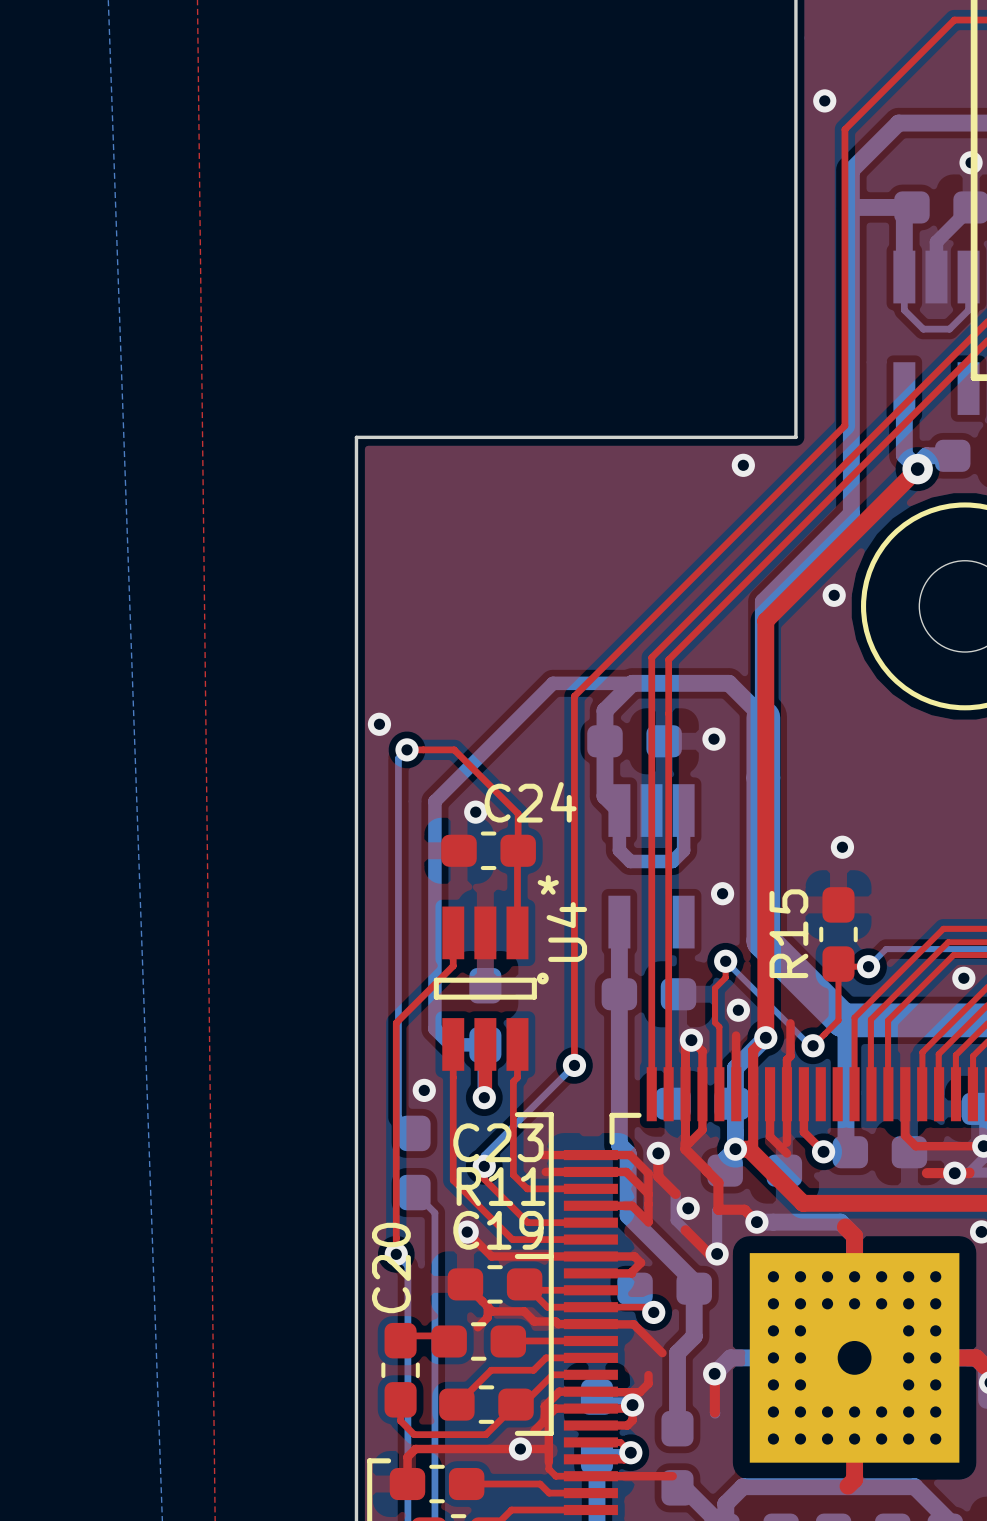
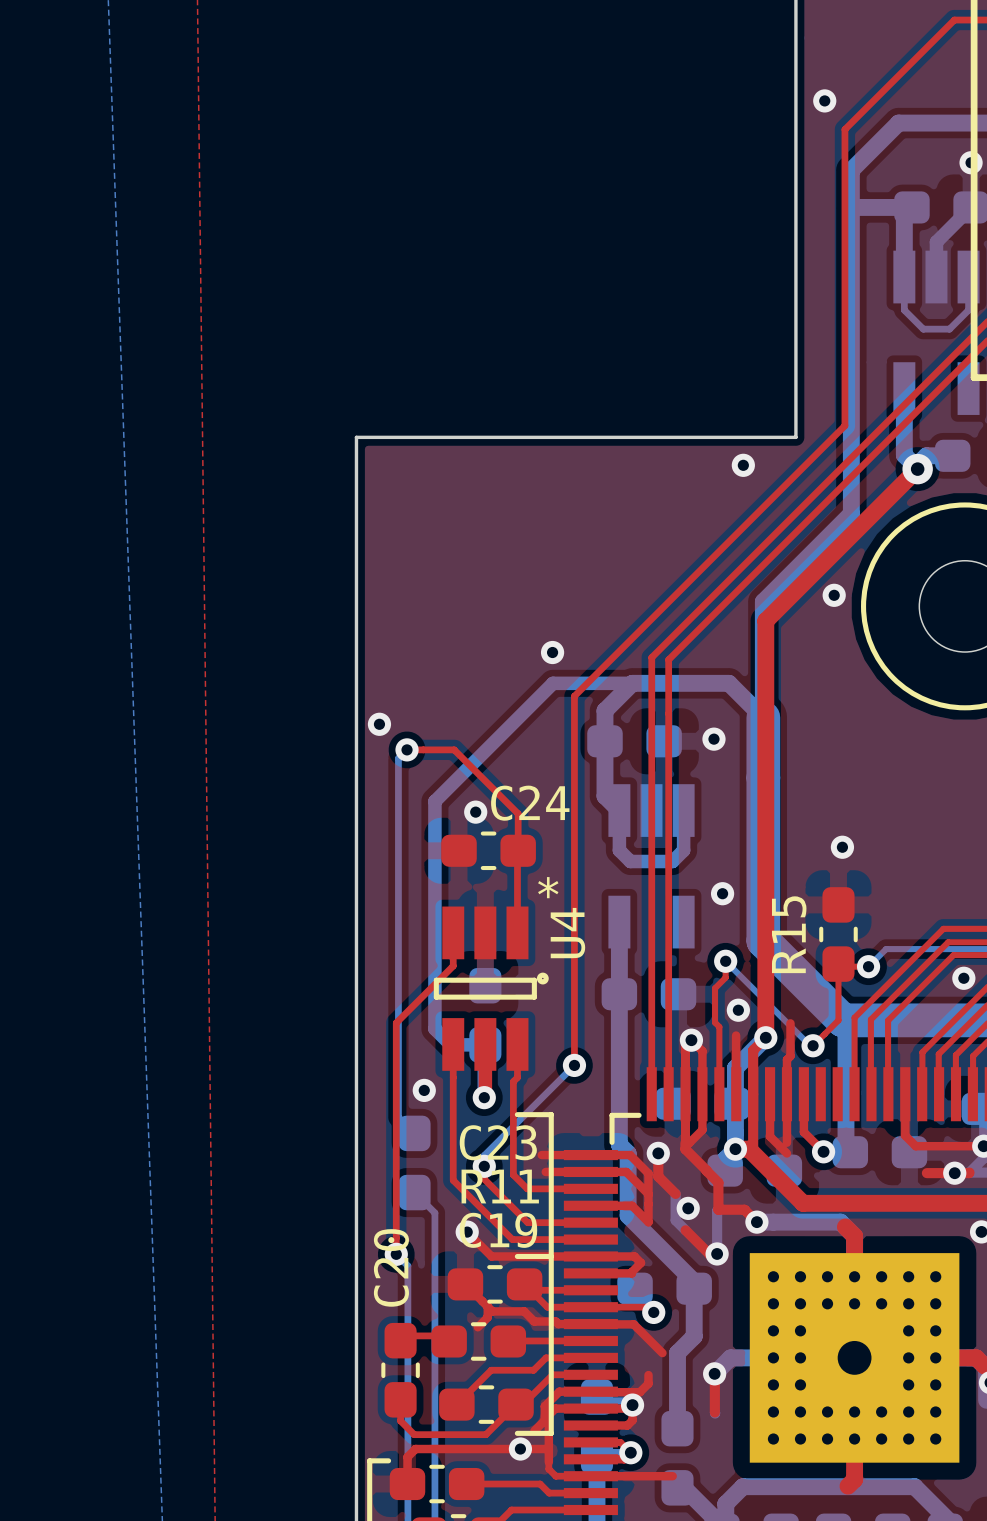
via: none -> (552, 652)

